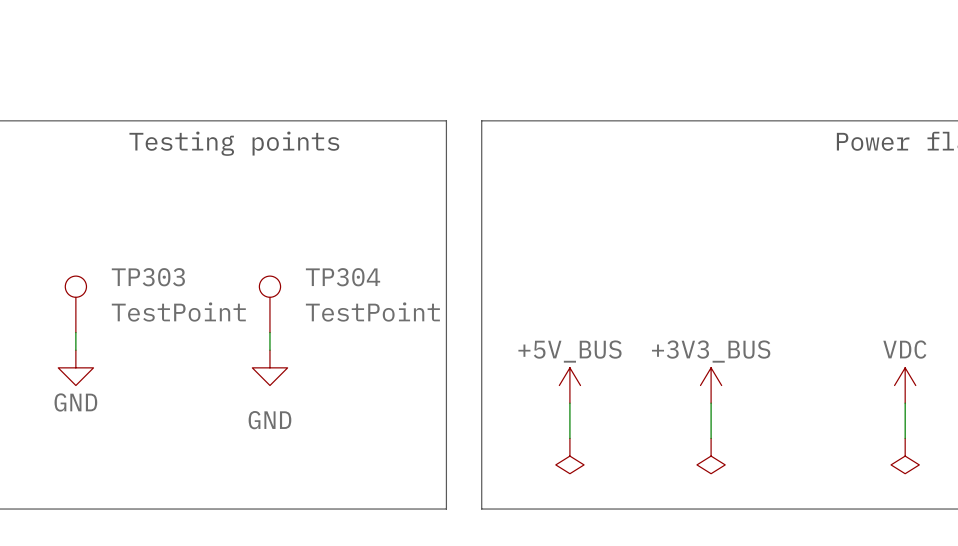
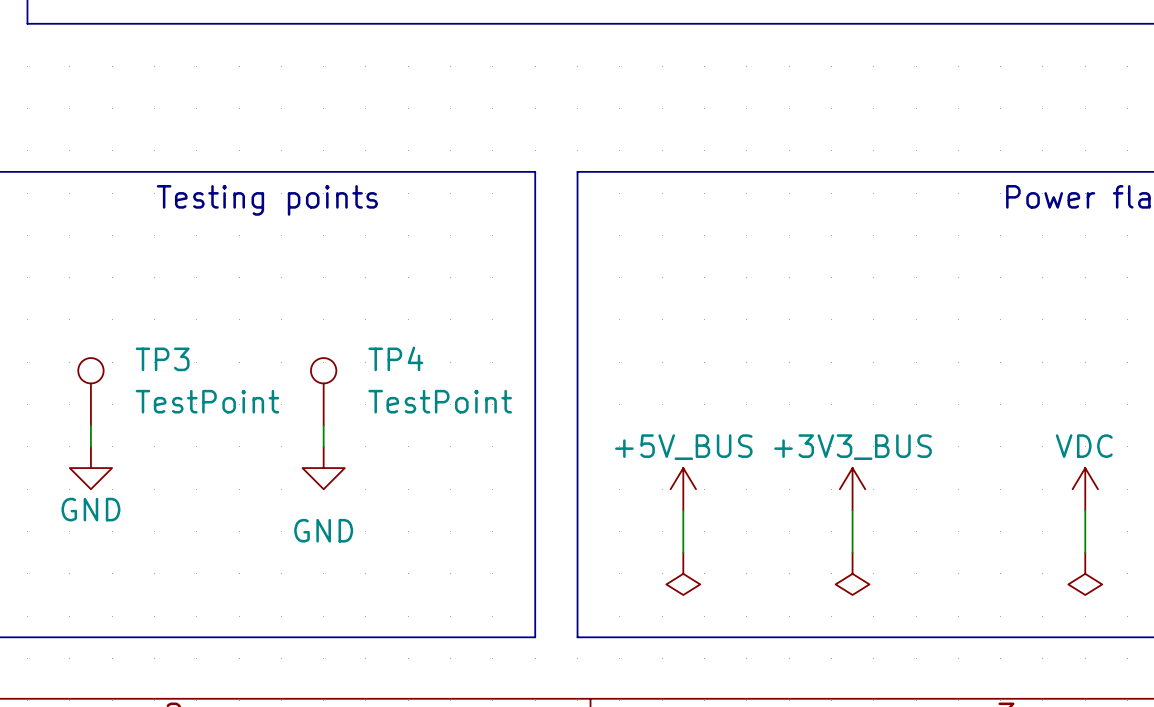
TP303 name: TP303 (148, 277) -> TP3 (162, 359)
TP304 name: TP304 (343, 277) -> TP4 (395, 358)

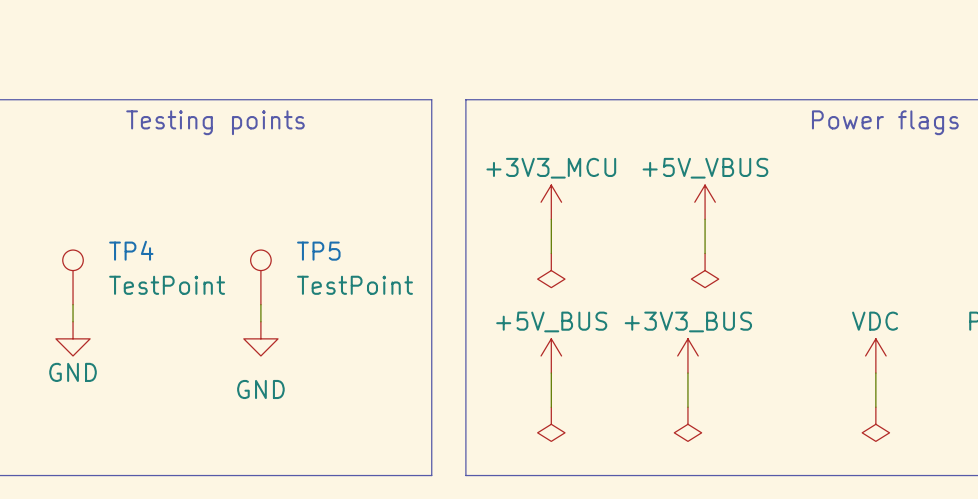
power symbol: none -> +3V3_MCU (551, 202)
power symbol: none -> +5V_VBUS (705, 202)
wire: none -> (551, 219) (551, 253)
wire: none -> (705, 219) (705, 253)
TP4 name: TP4 (395, 358) -> TP5 (318, 251)
TP3 name: TP3 (162, 359) -> TP4 (131, 250)
power symbol: none -> (551, 270)
power symbol: none -> (705, 270)

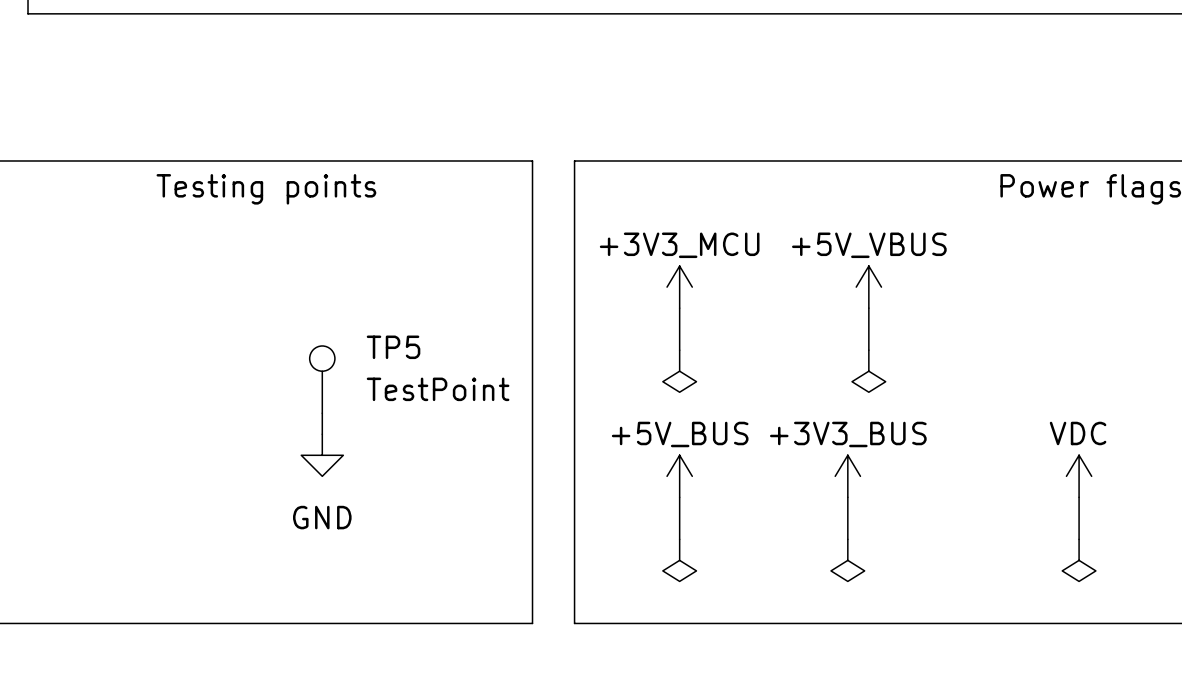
TP4: TestPoint (73, 277) -> none
wire: (73, 304) (73, 321) -> none
power symbol: GND (73, 338) -> none

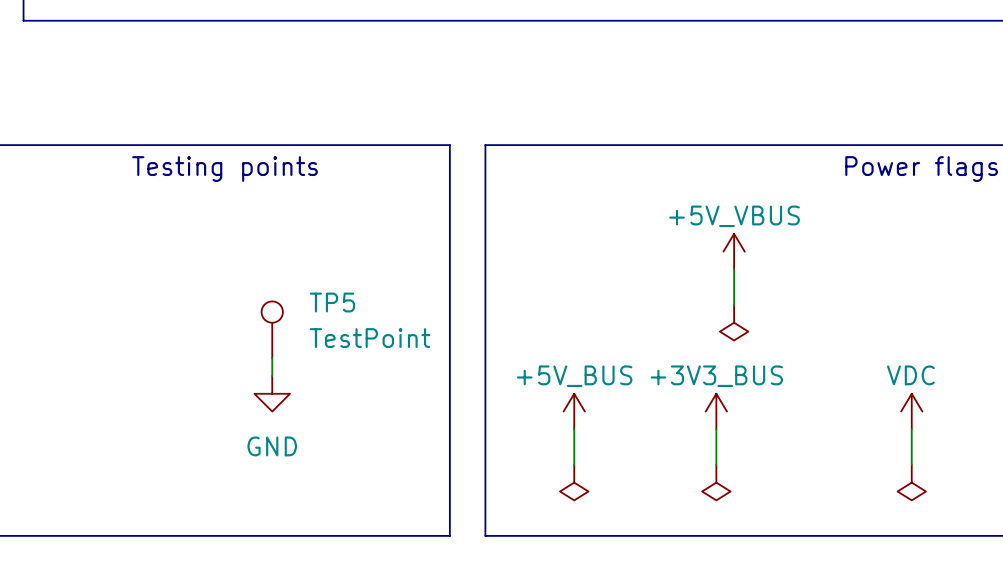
power symbol: +3V3_MCU (679, 287) -> none
wire: (679, 308) (679, 350) -> none
power symbol: (679, 371) -> none

